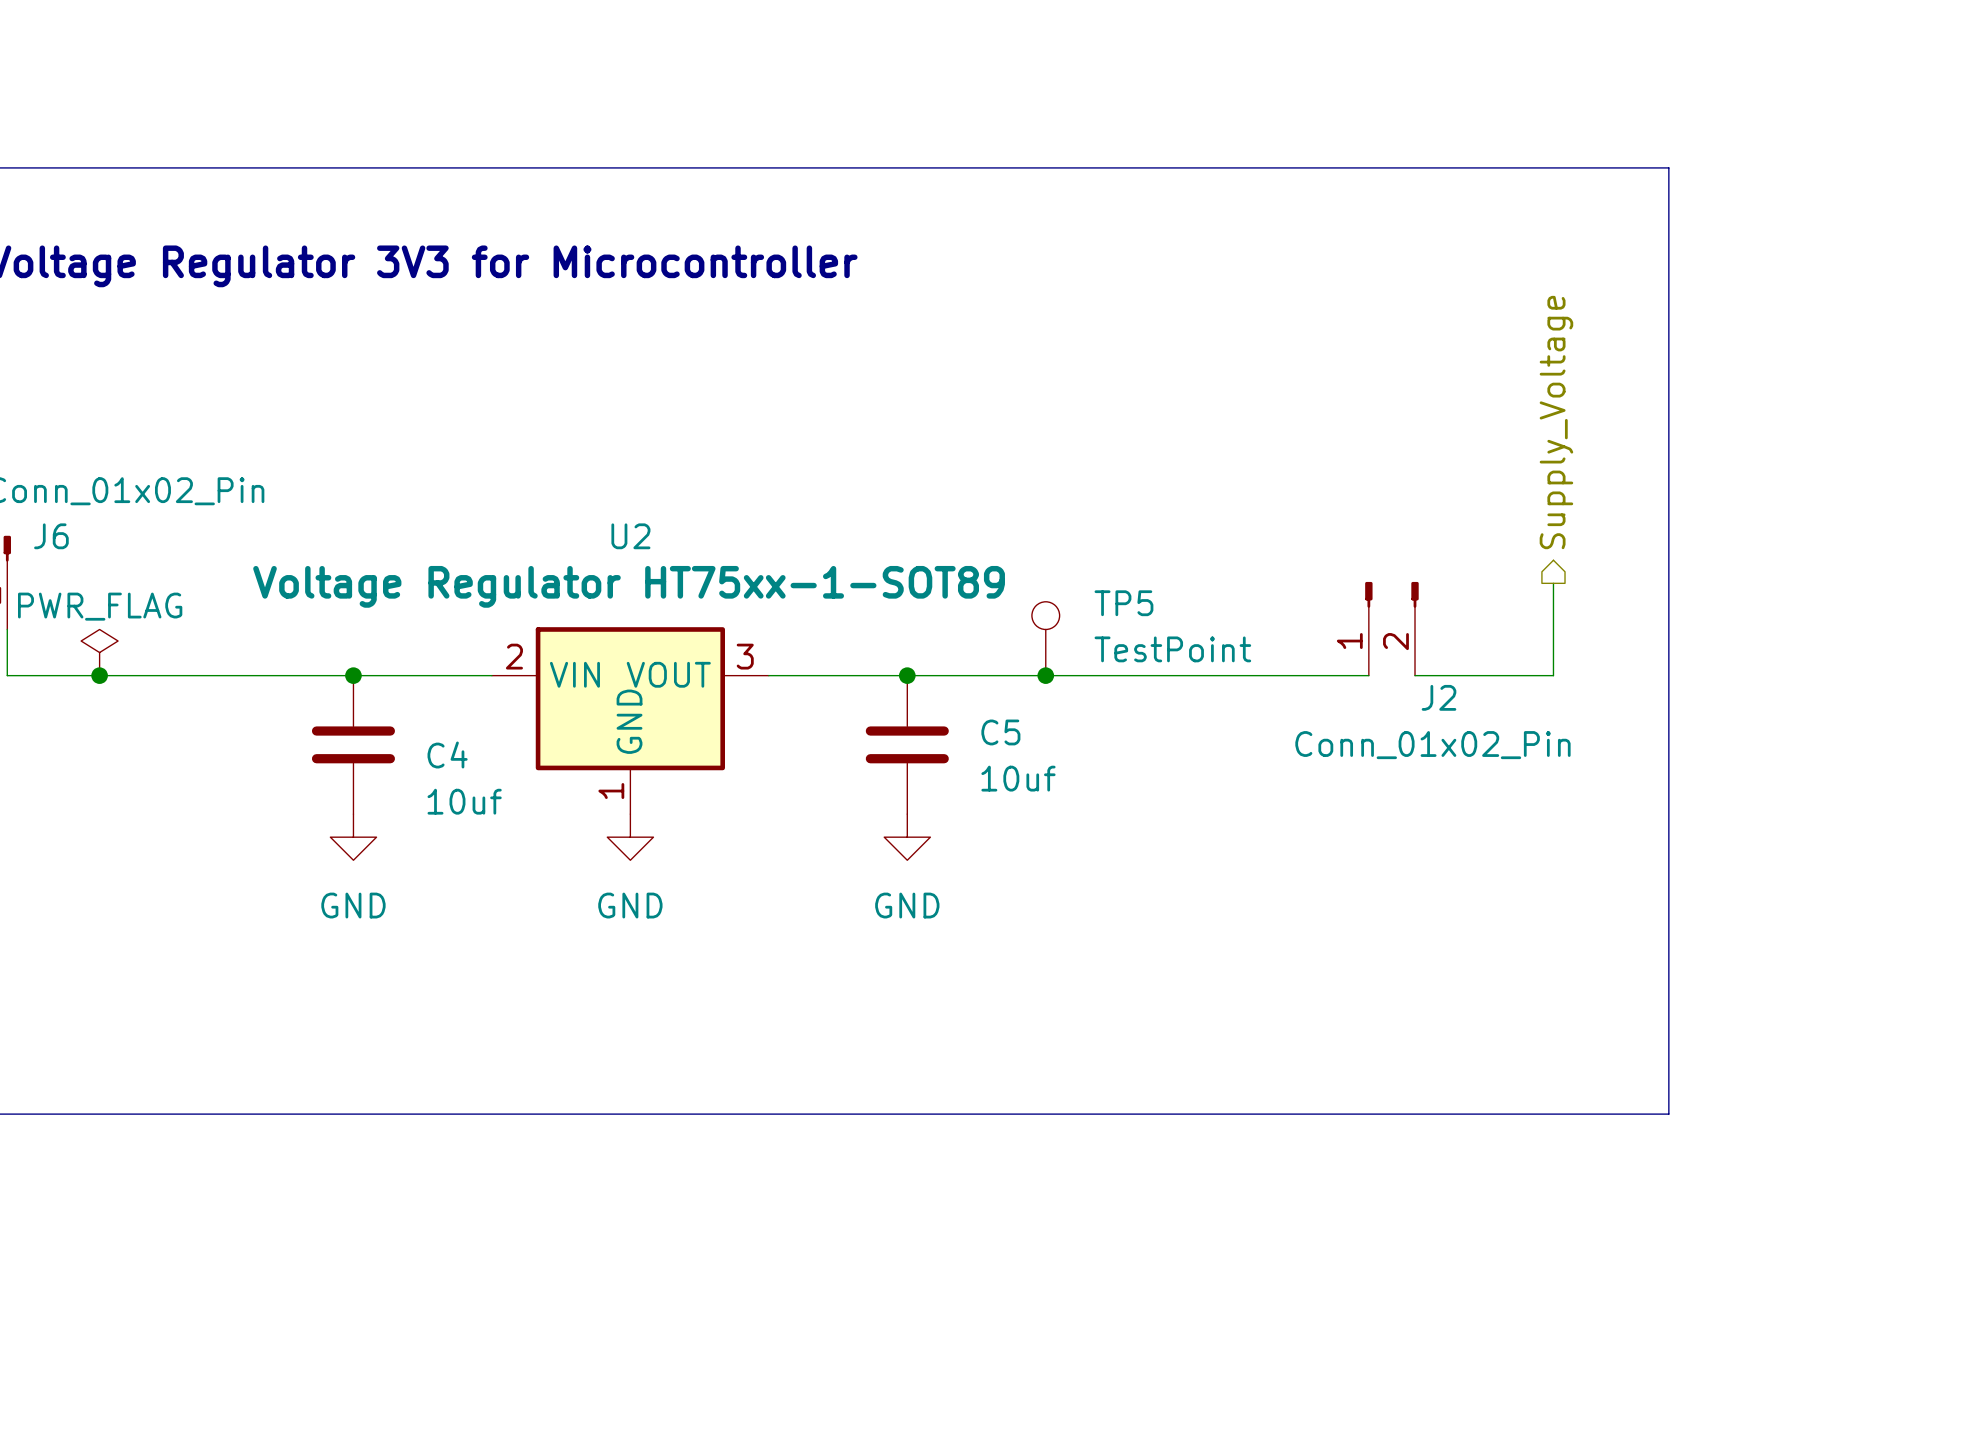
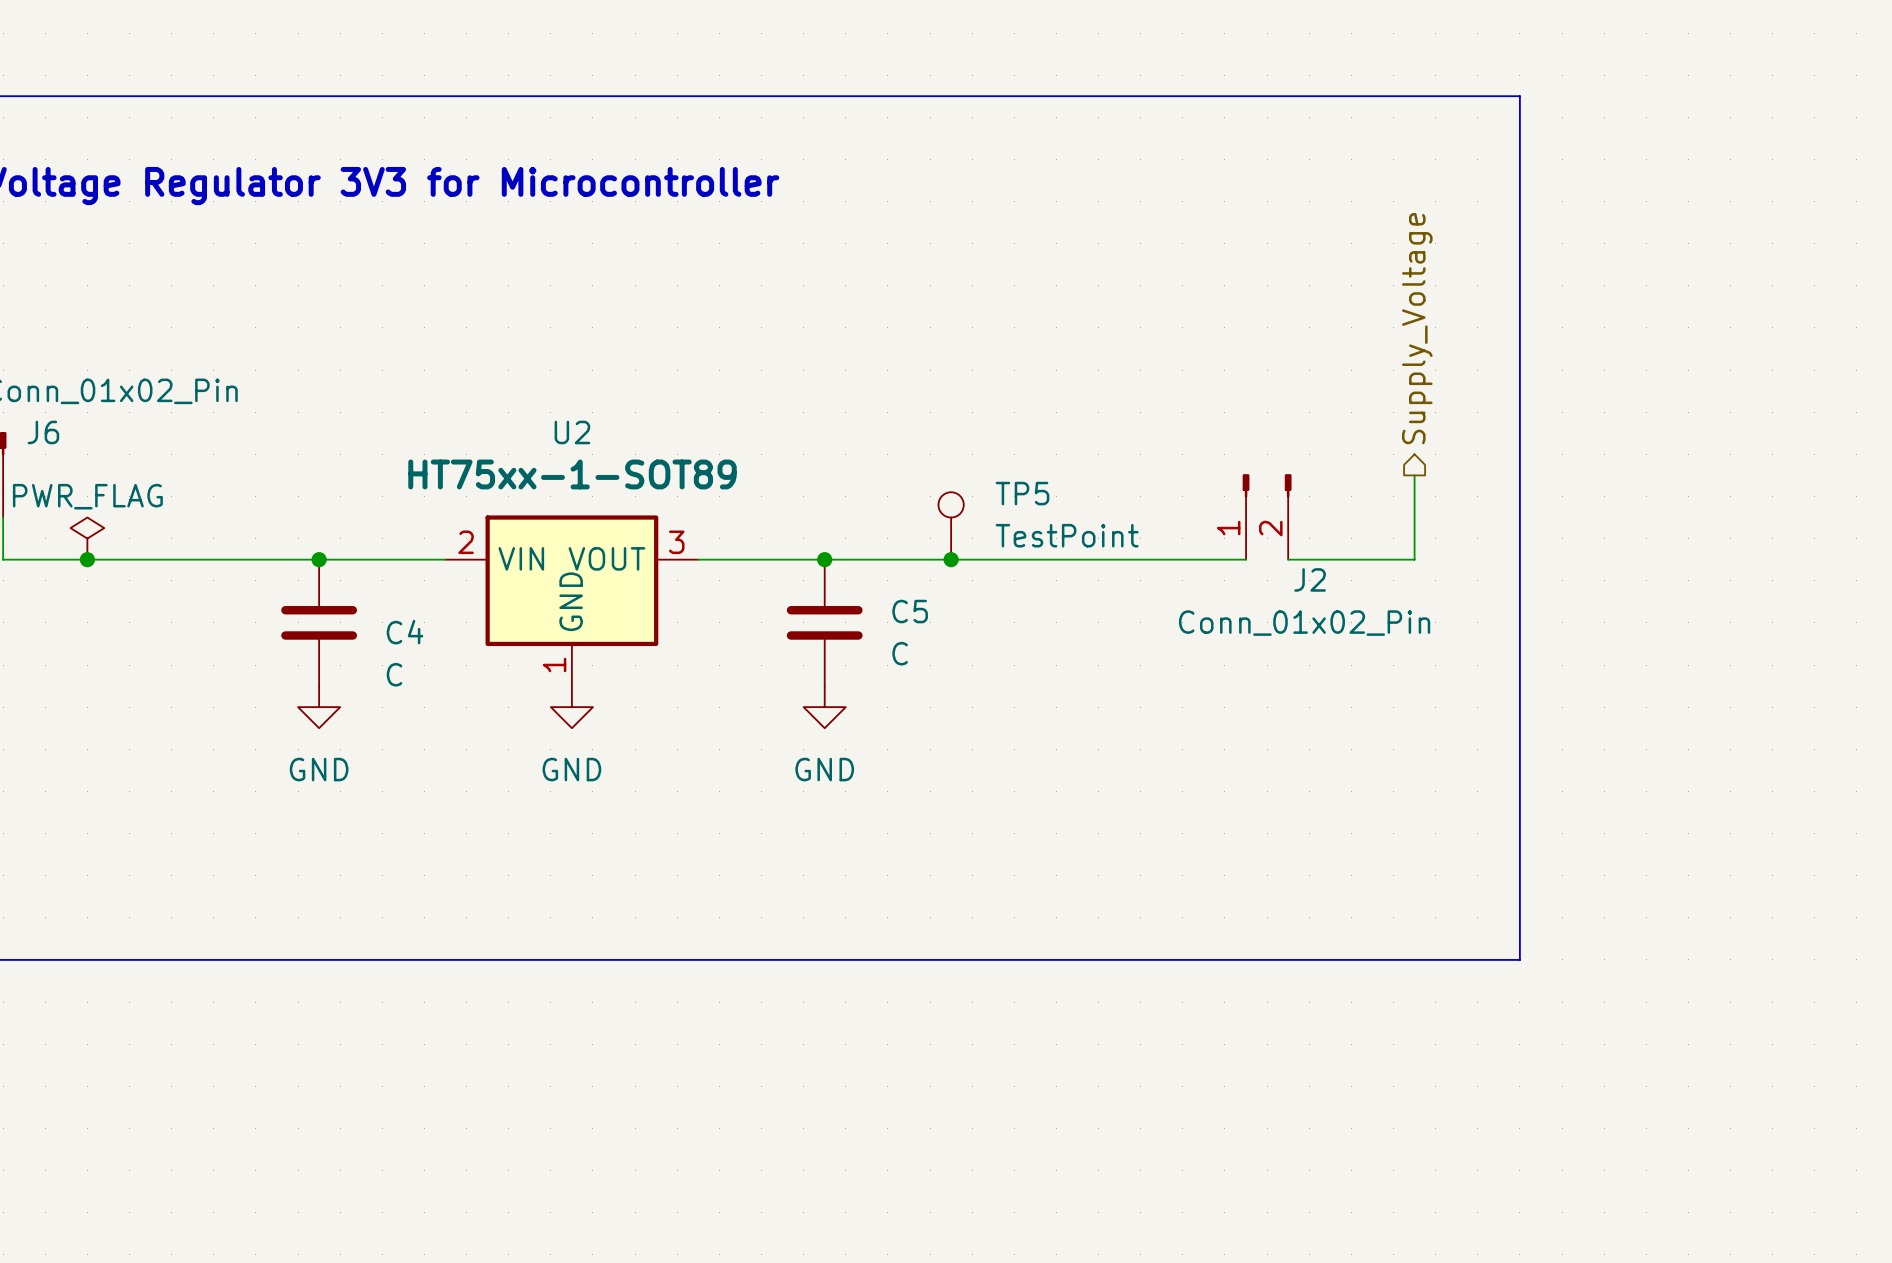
U2 value: Voltage Regulator HT75xx-1-SOT89 (629, 586) -> HT75xx-1-SOT89 (572, 474)
C5 value: 10uf (1018, 778) -> C (900, 653)
C4 value: 10uf (464, 801) -> C (394, 674)

